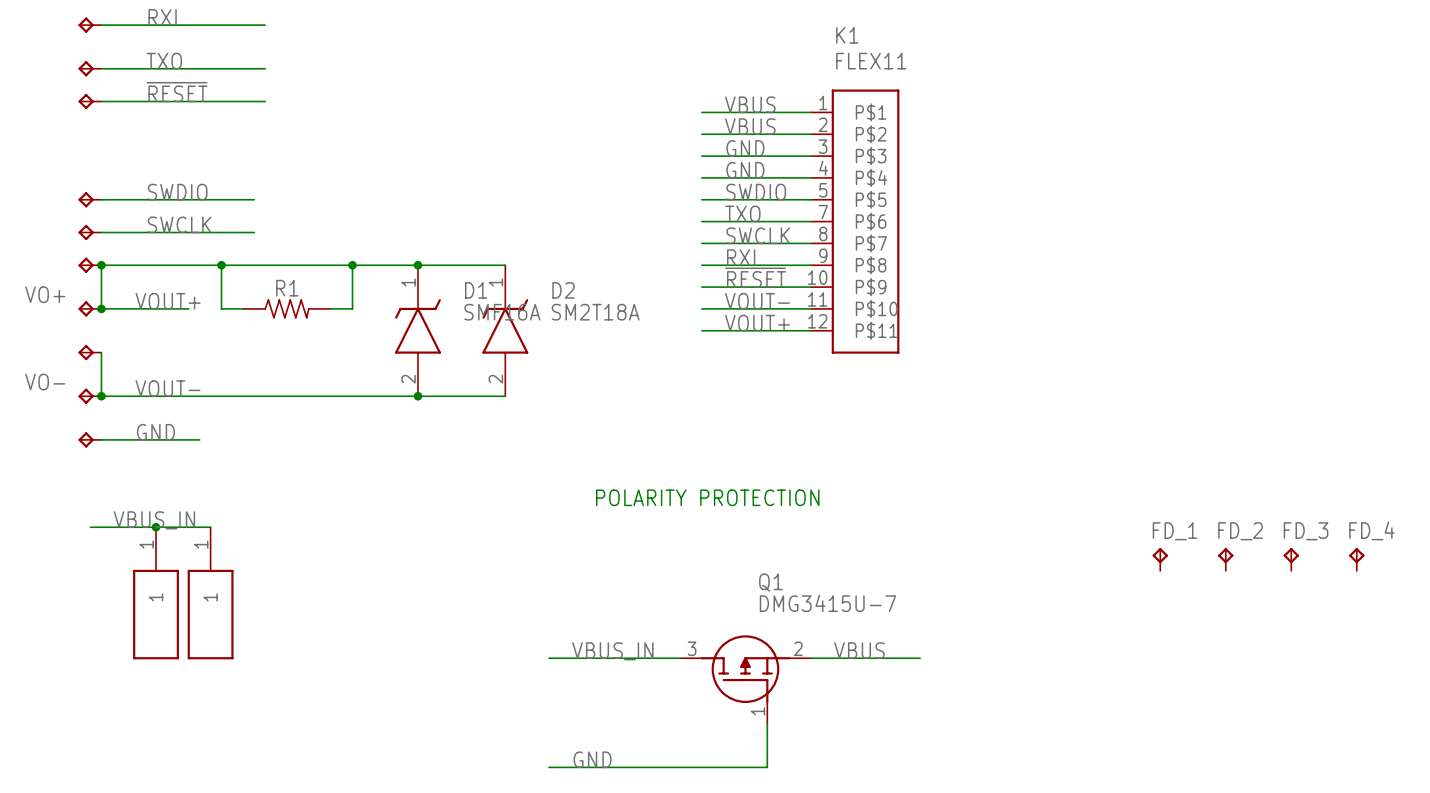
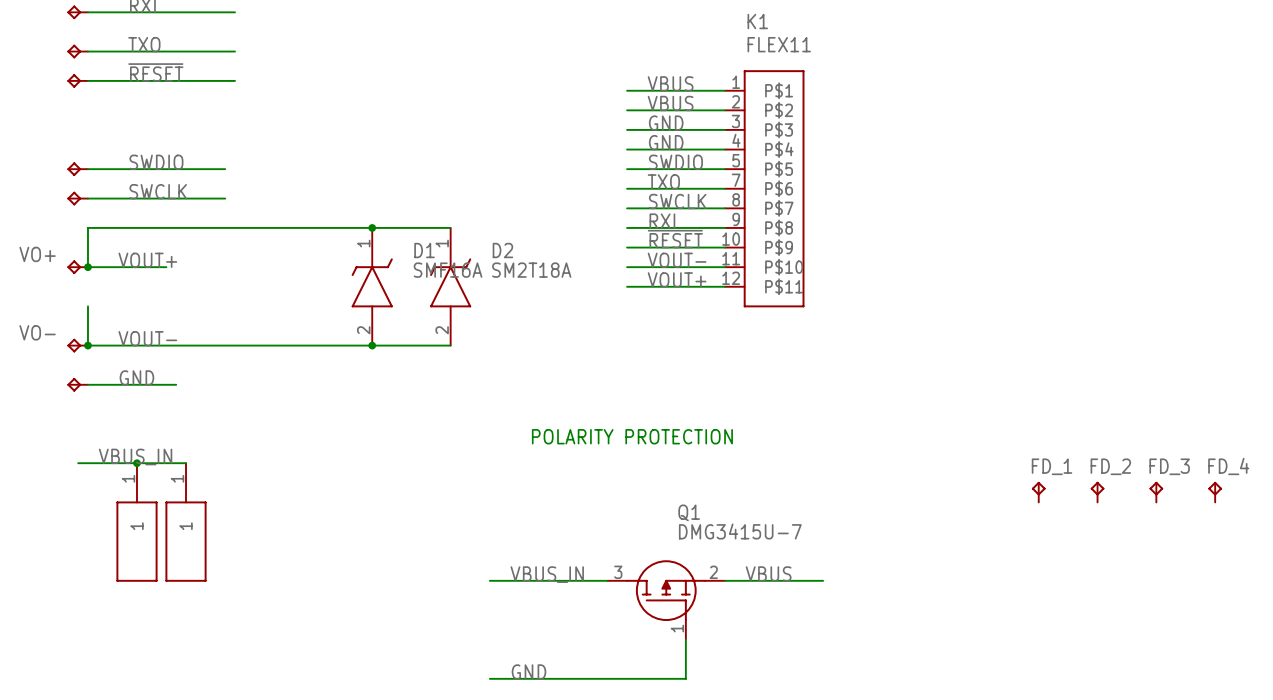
part: (89, 265) -> none
junction: (101, 265) -> none
wire: (221, 265) (221, 308) (243, 308) -> none
junction: (221, 265) -> none
wire: (352, 265) (352, 308) (330, 308) -> none
junction: (352, 265) -> none
R1: (287, 308) -> none
part: (89, 352) -> none

